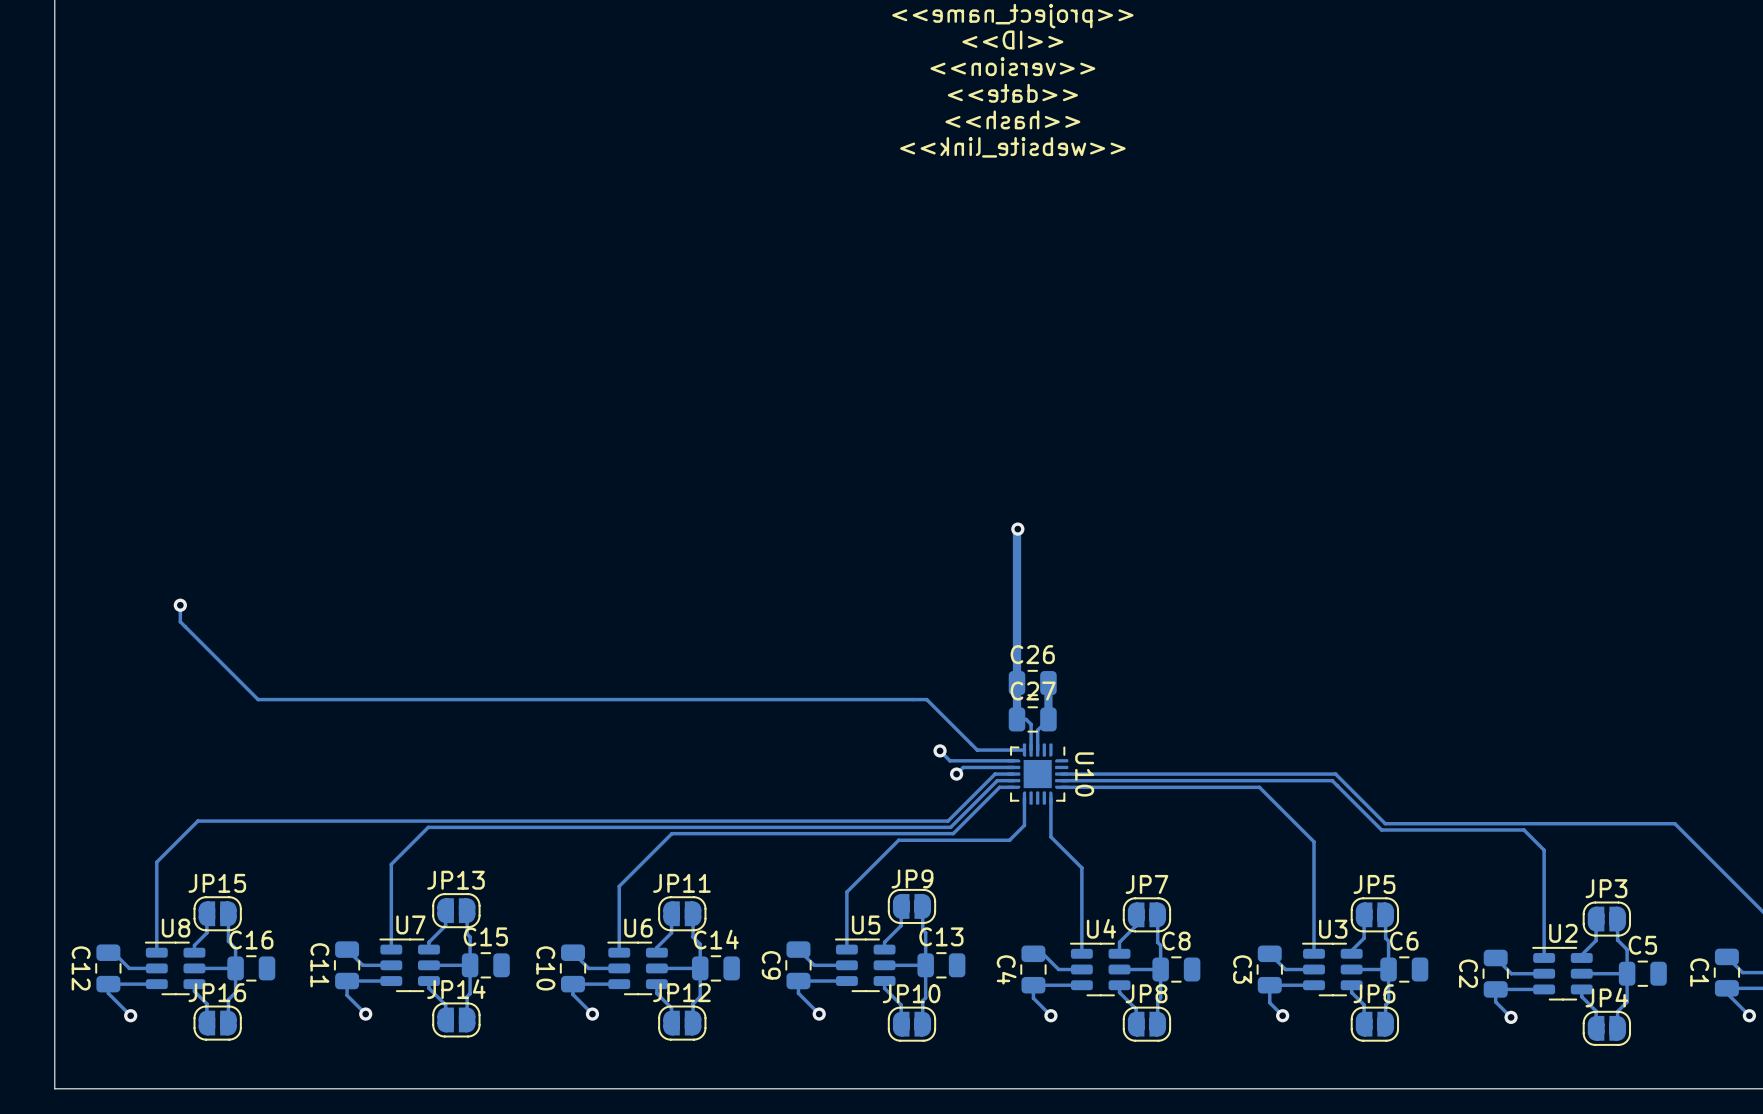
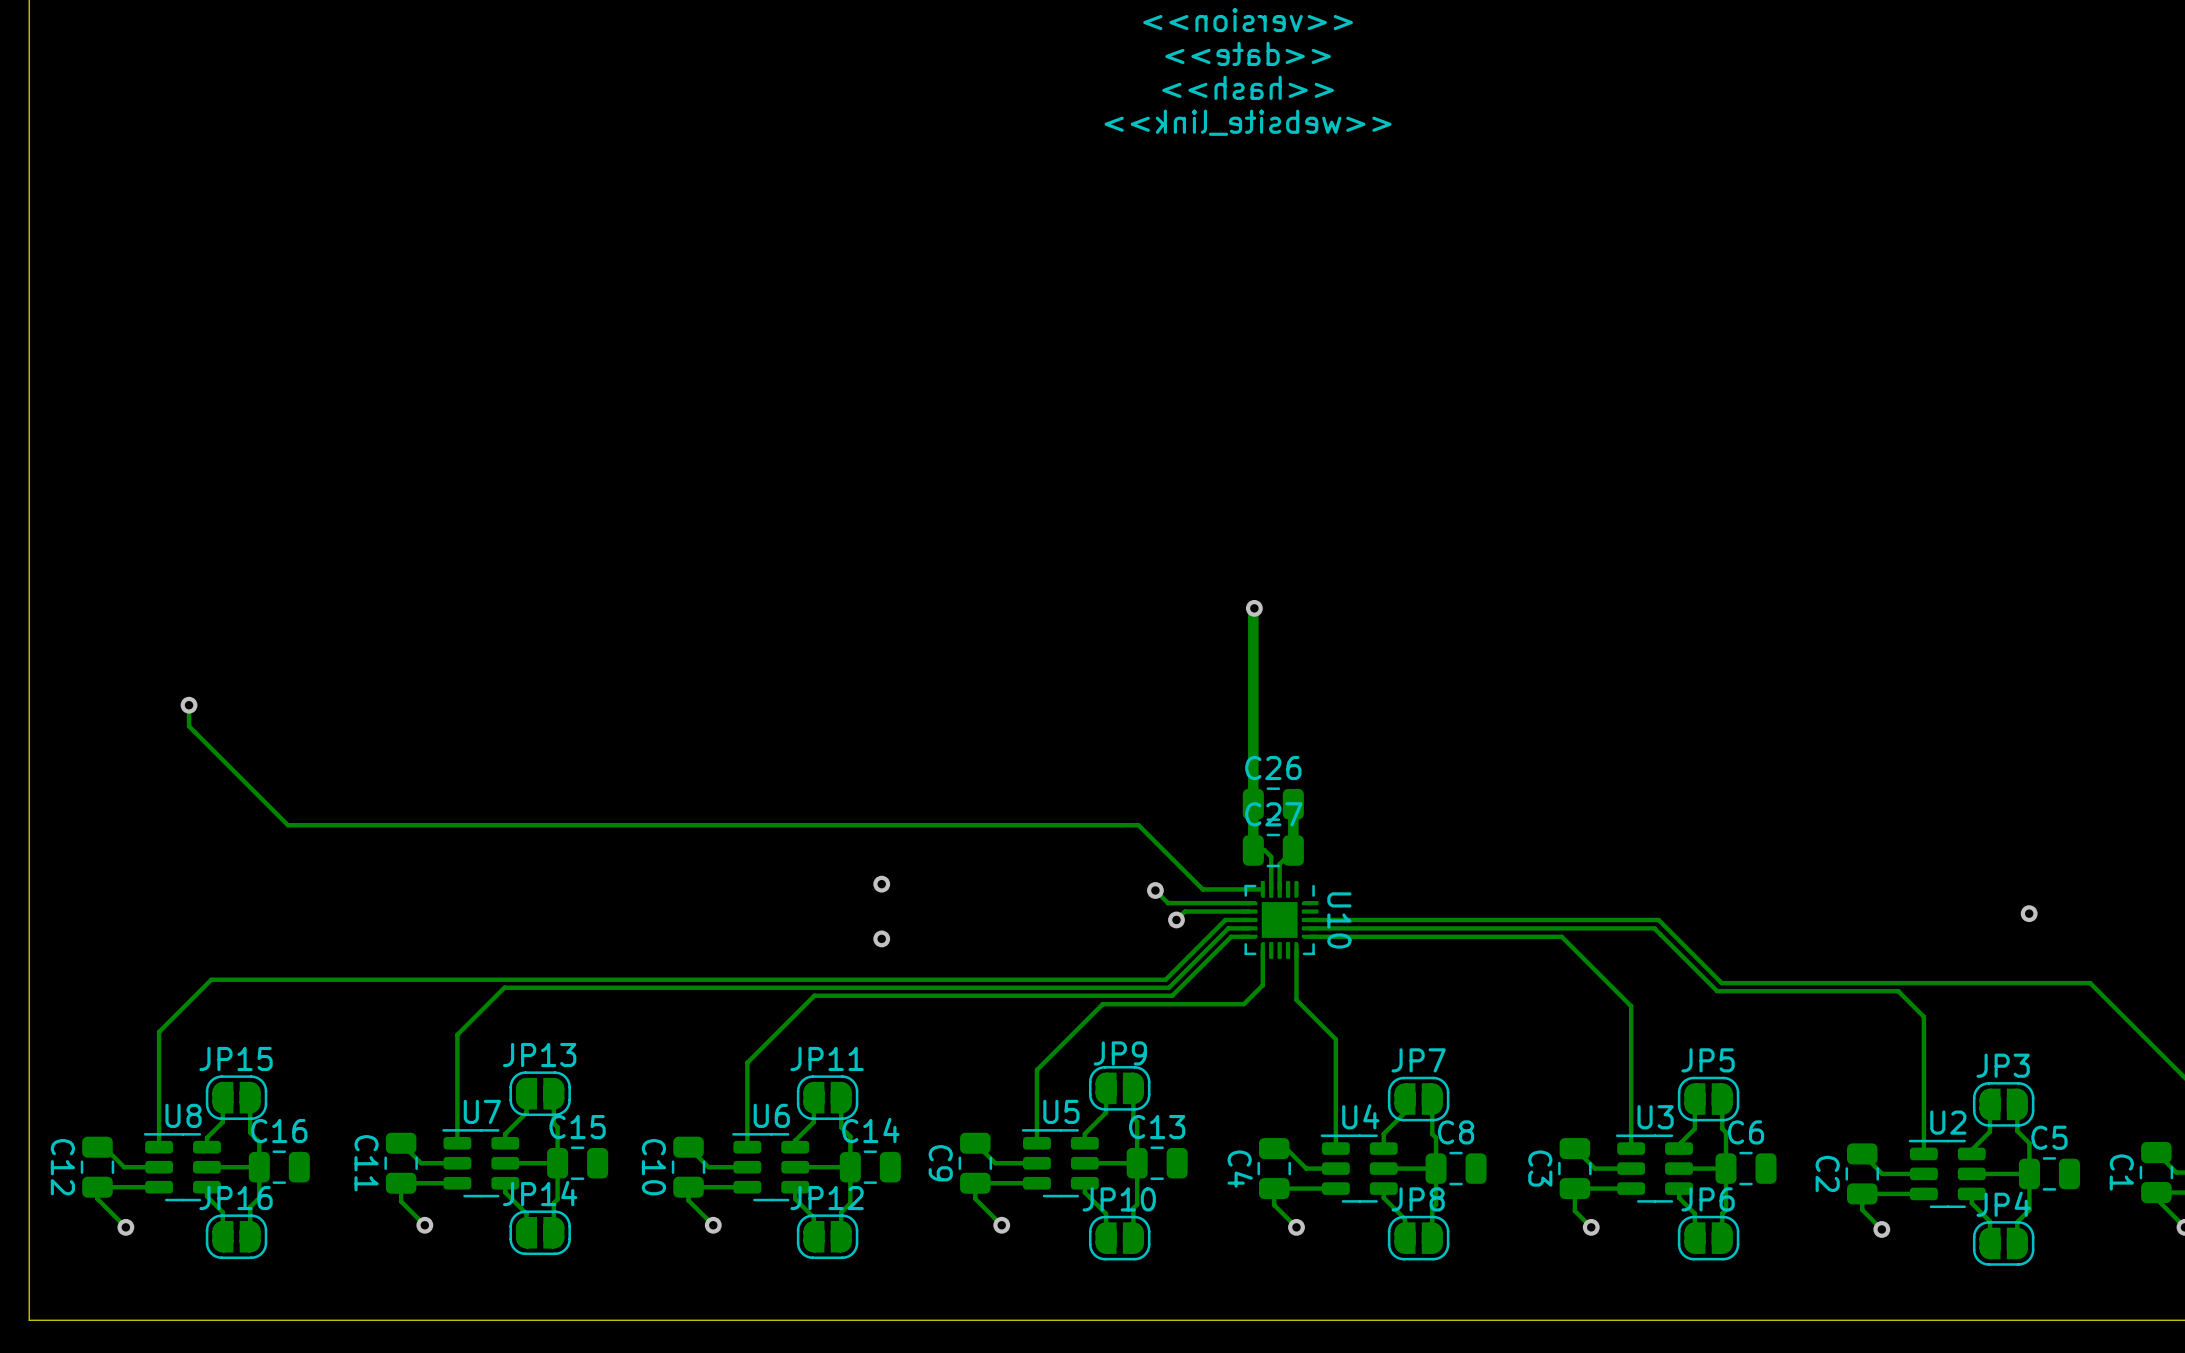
via: none -> (881, 884)
via: none -> (2029, 913)
via: none -> (881, 938)

